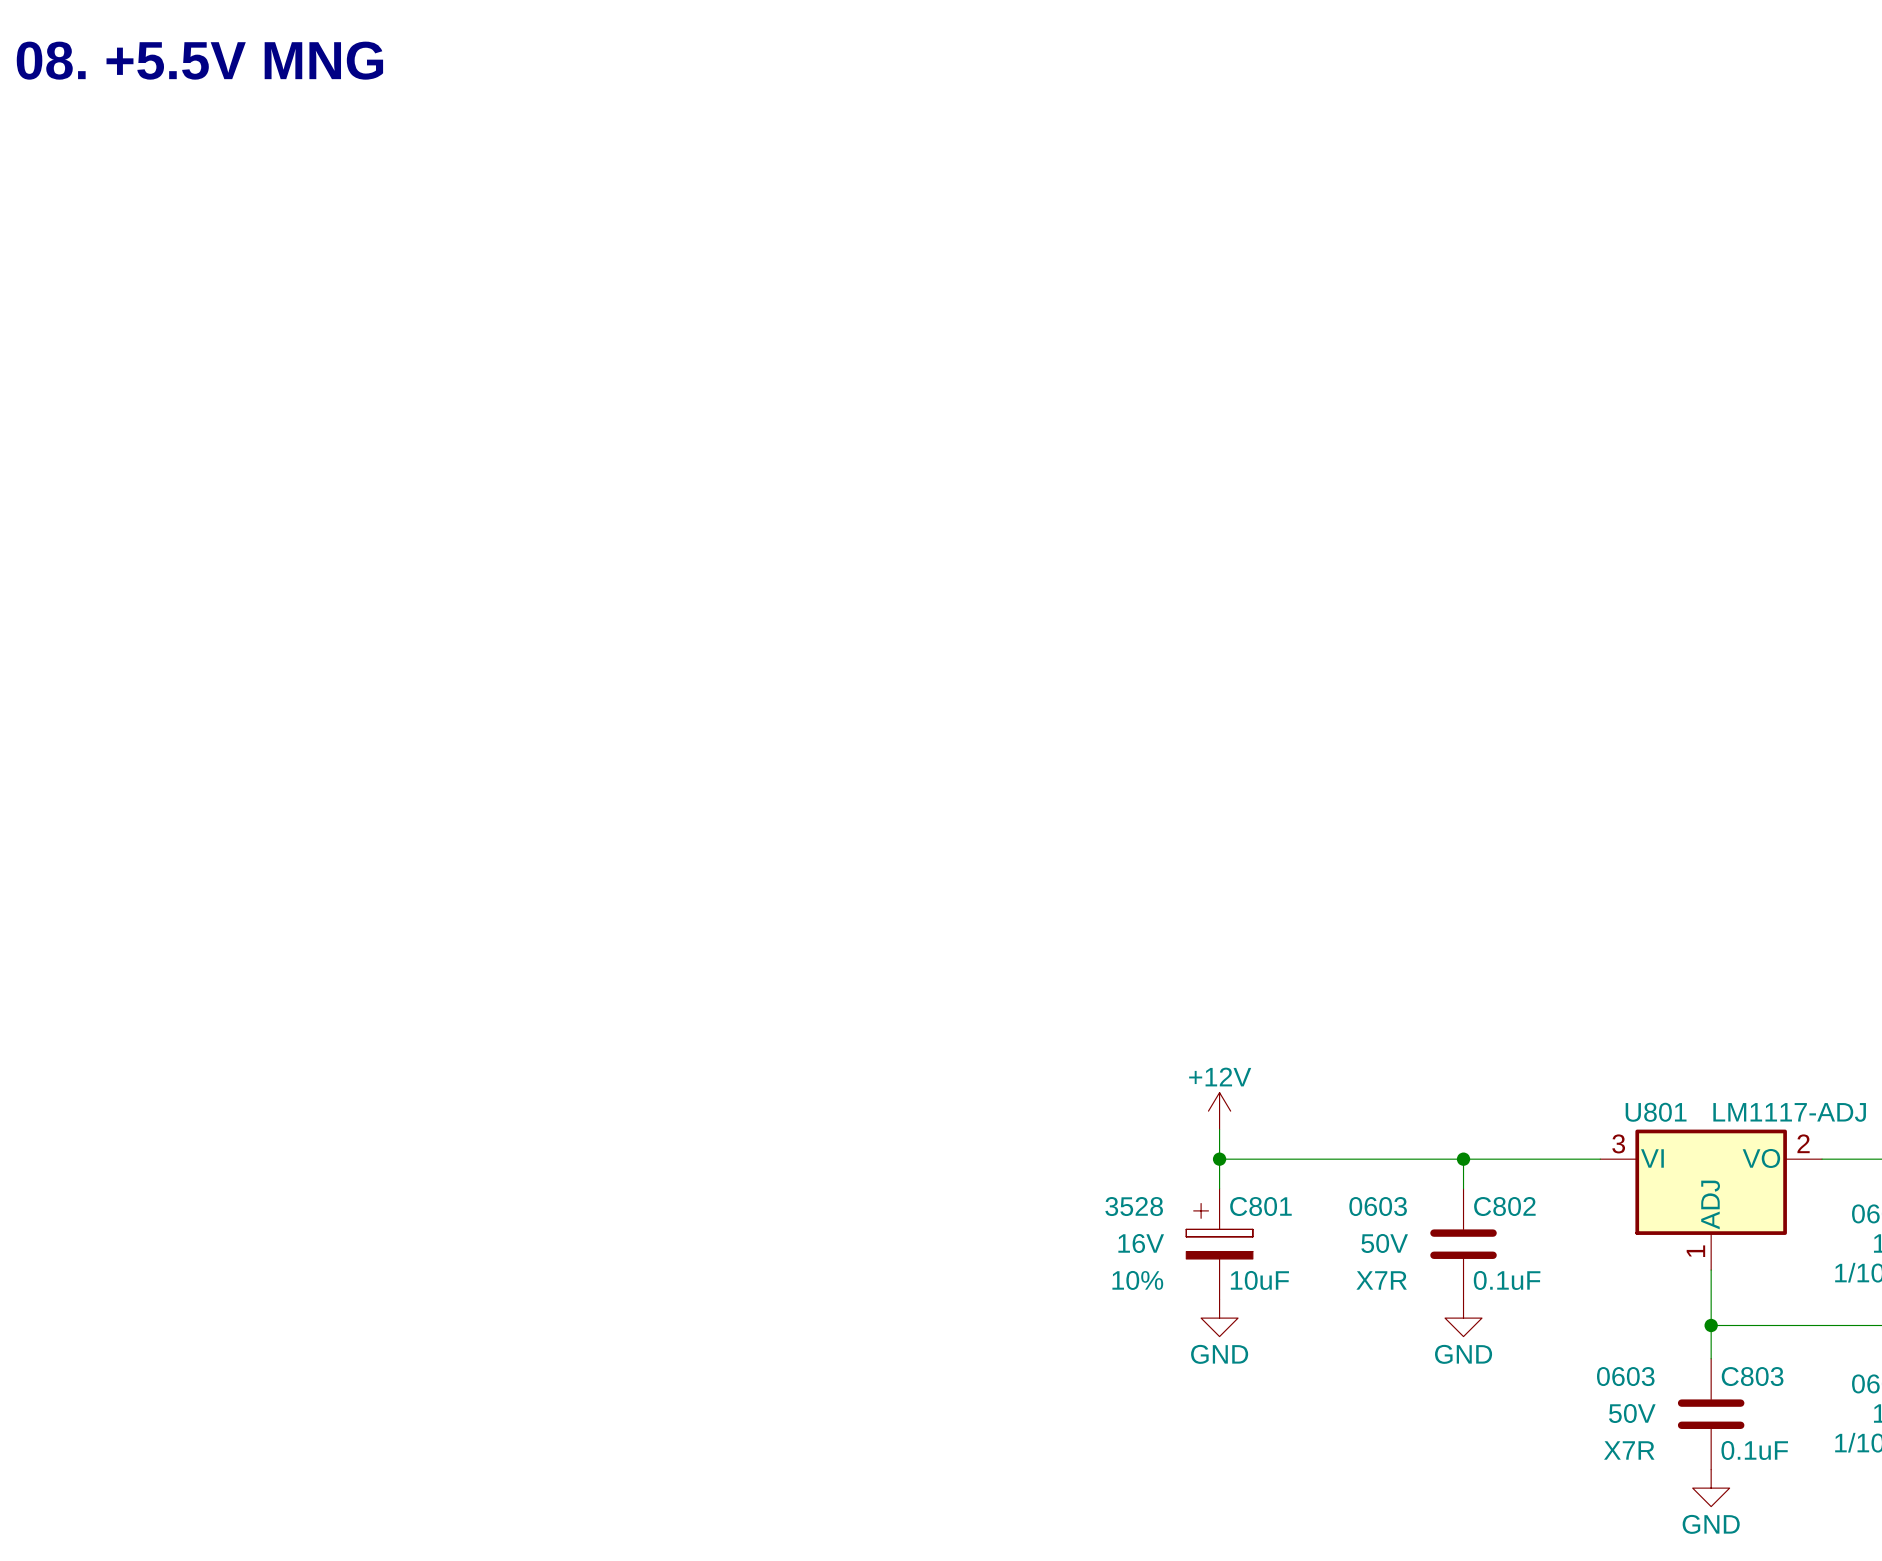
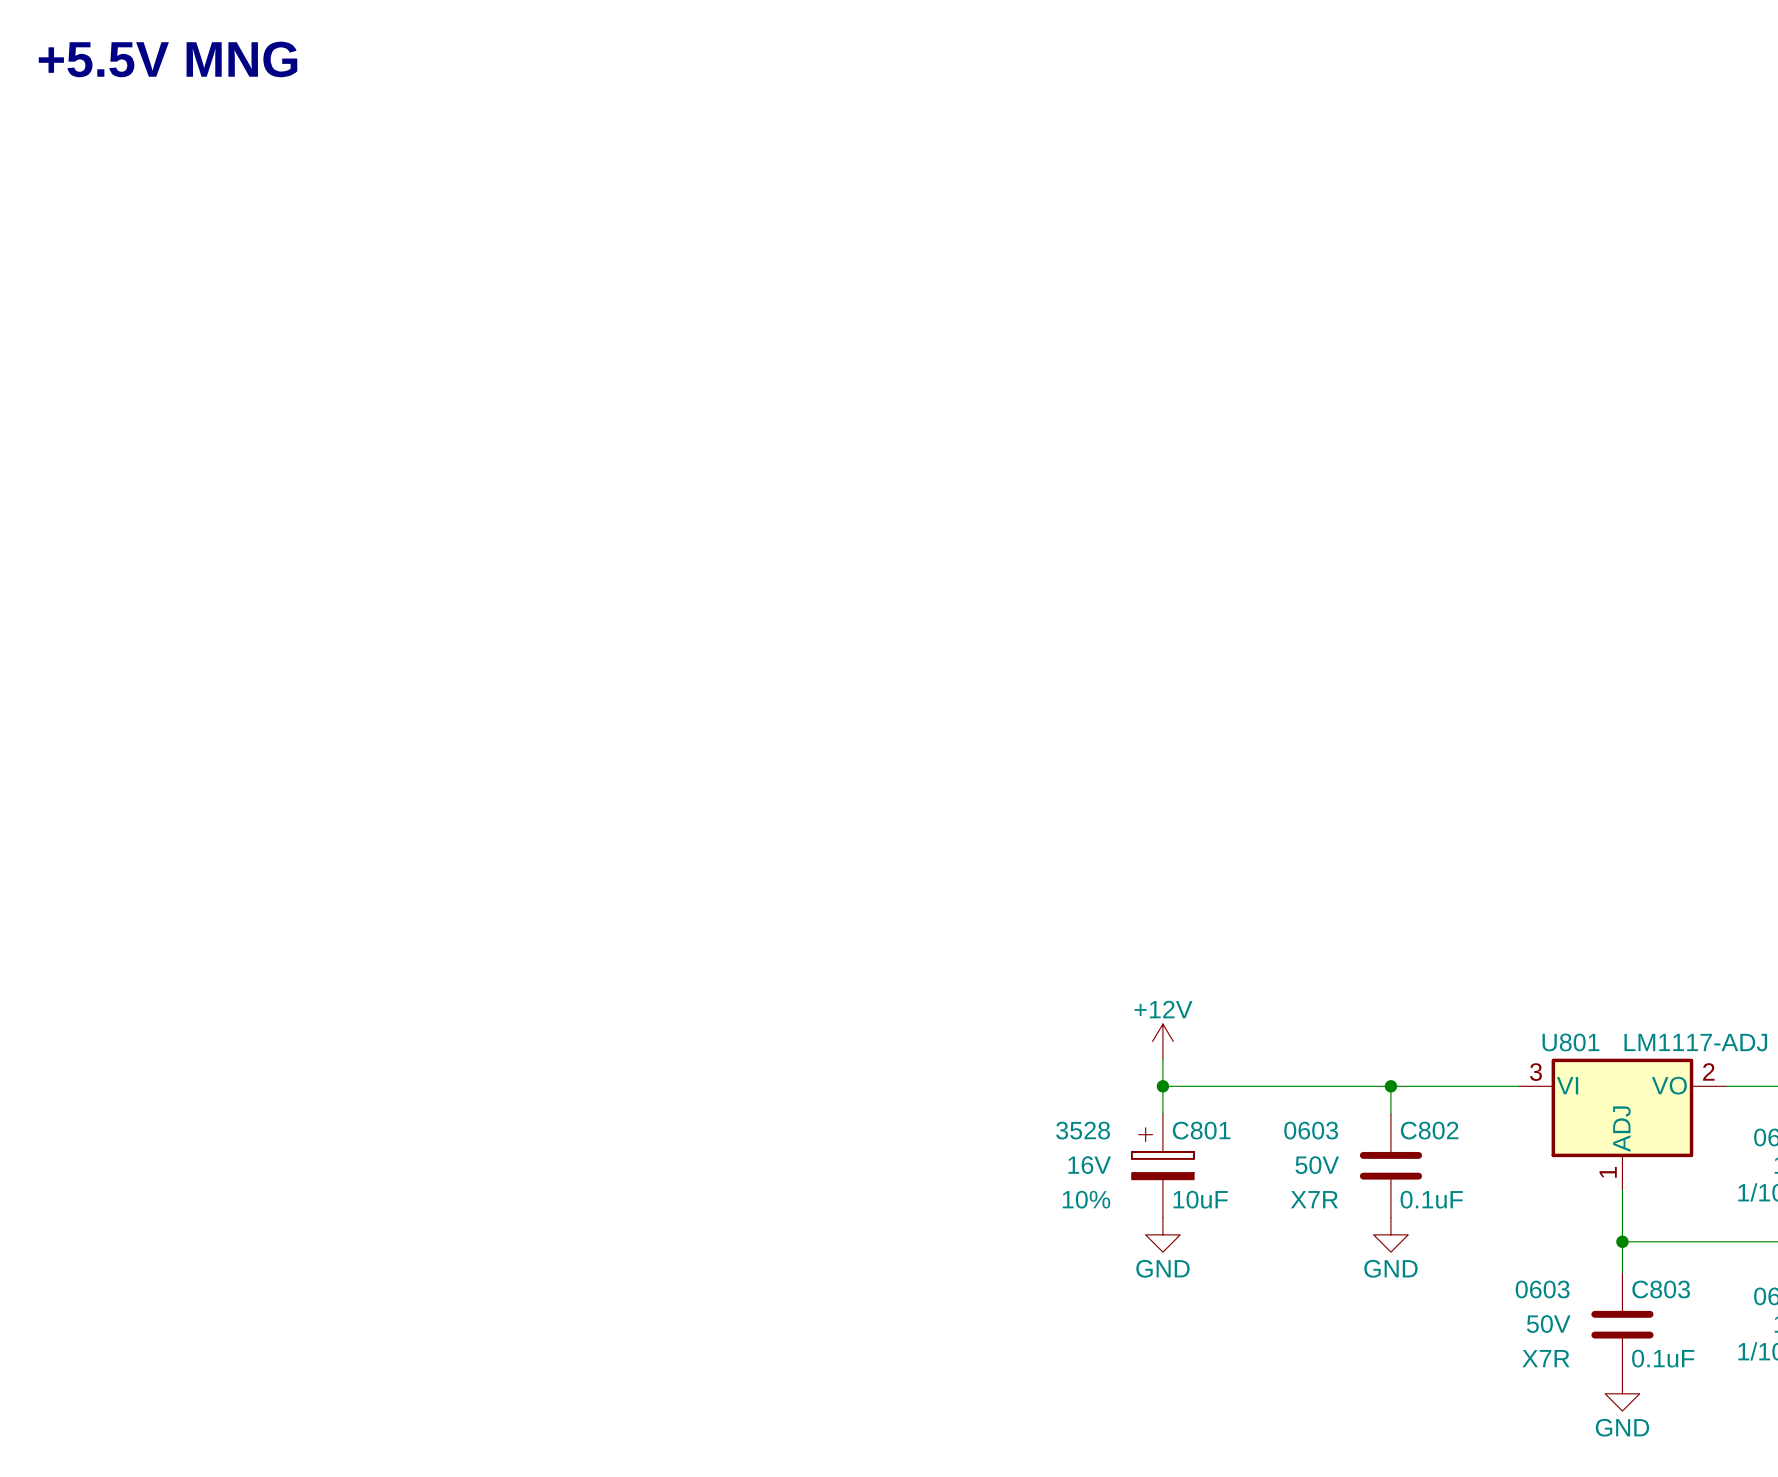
text: 08. +5.5V MNG (199, 60) -> +5.5V MNG (168, 59)

